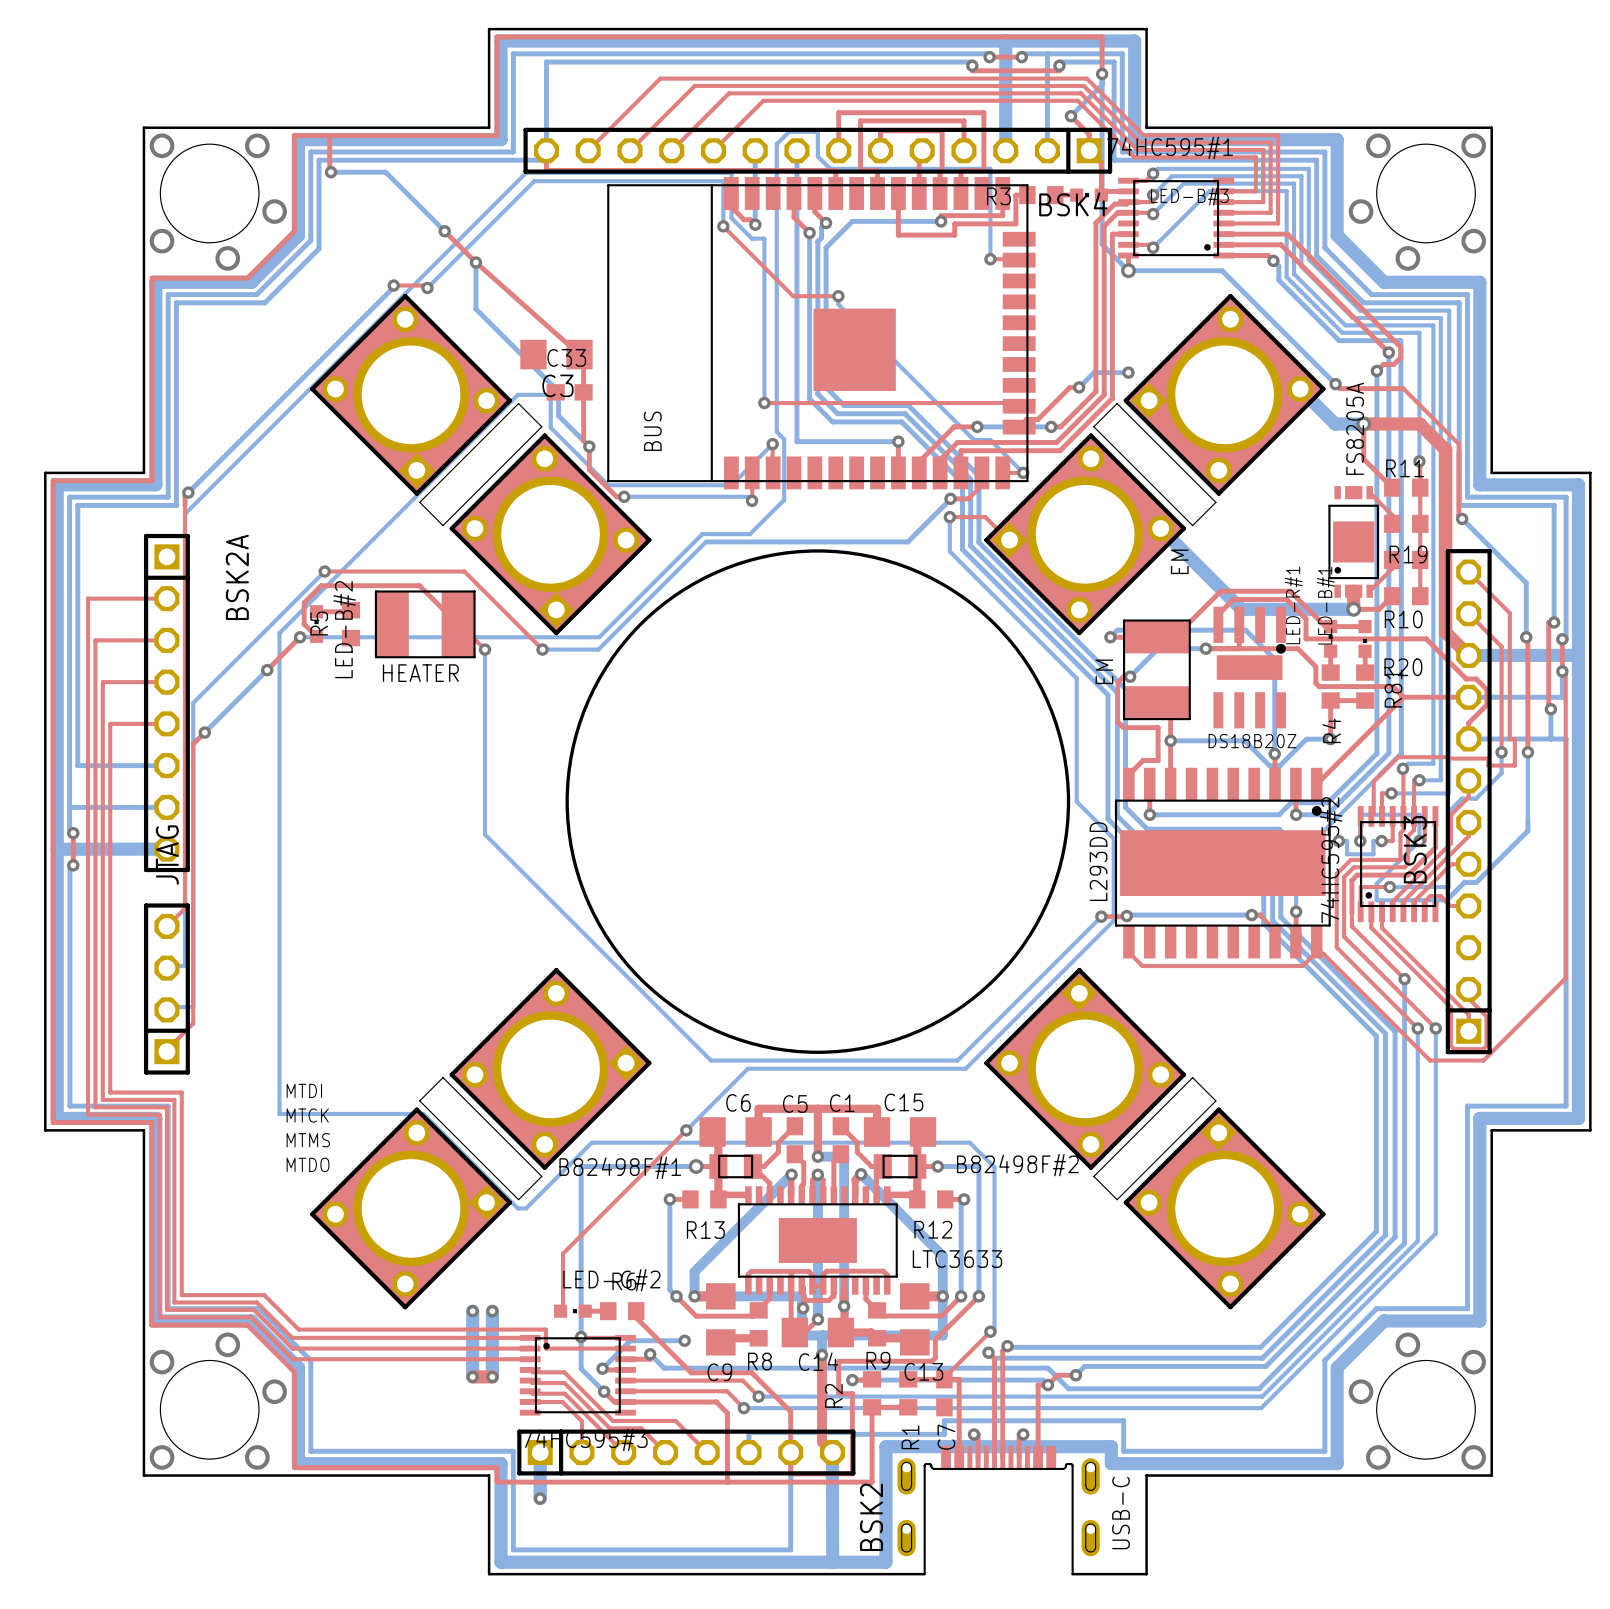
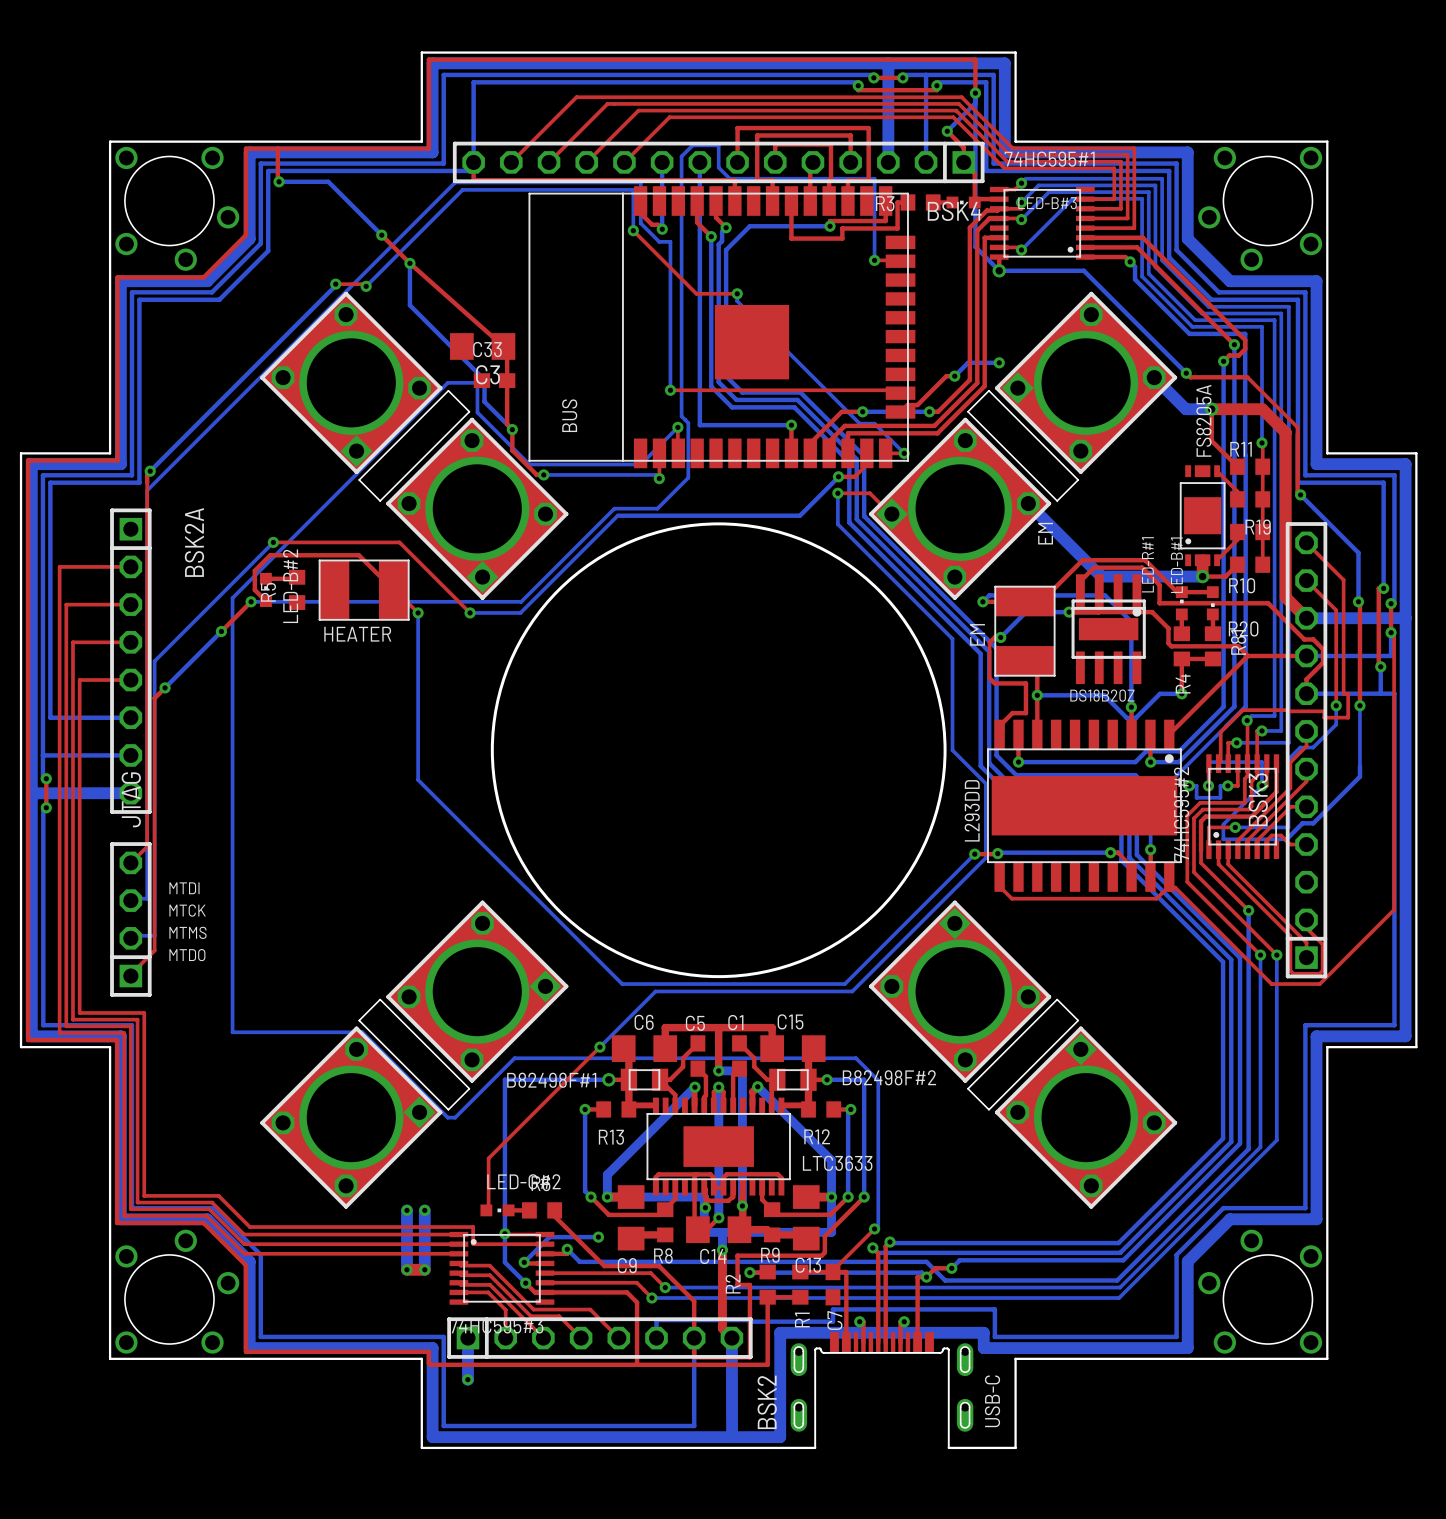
DS18B20Z footprint: [1213, 606, 1286, 729] -> [1071, 574, 1146, 685]
text position: MTDI (304, 1090) -> MTDI (184, 888)
text position: MTCK (307, 1115) -> MTCK (187, 910)
text position: MTMS (308, 1140) -> MTMS (188, 932)
text position: MTDO (308, 1164) -> MTDO (187, 955)

